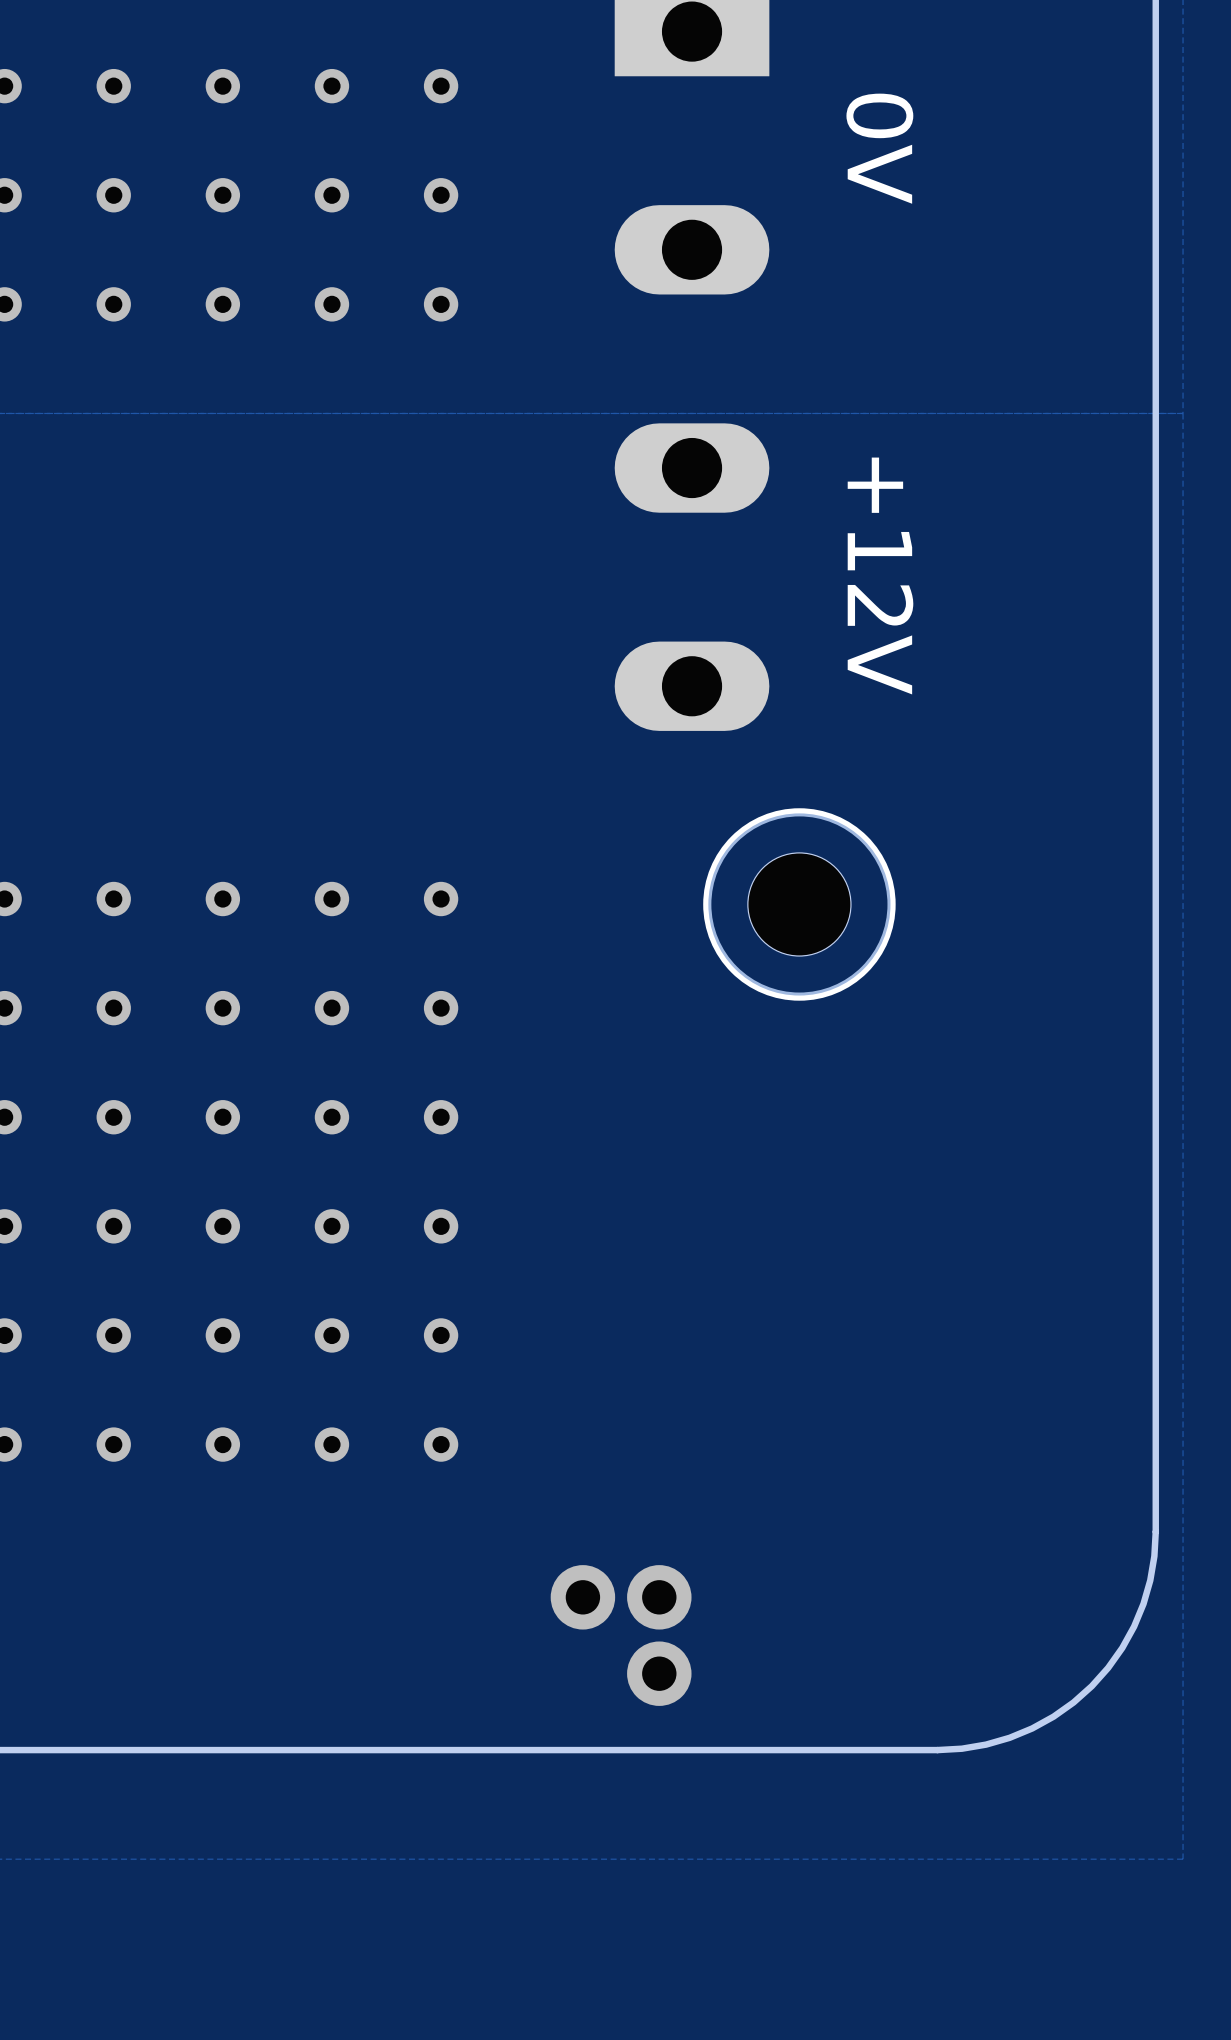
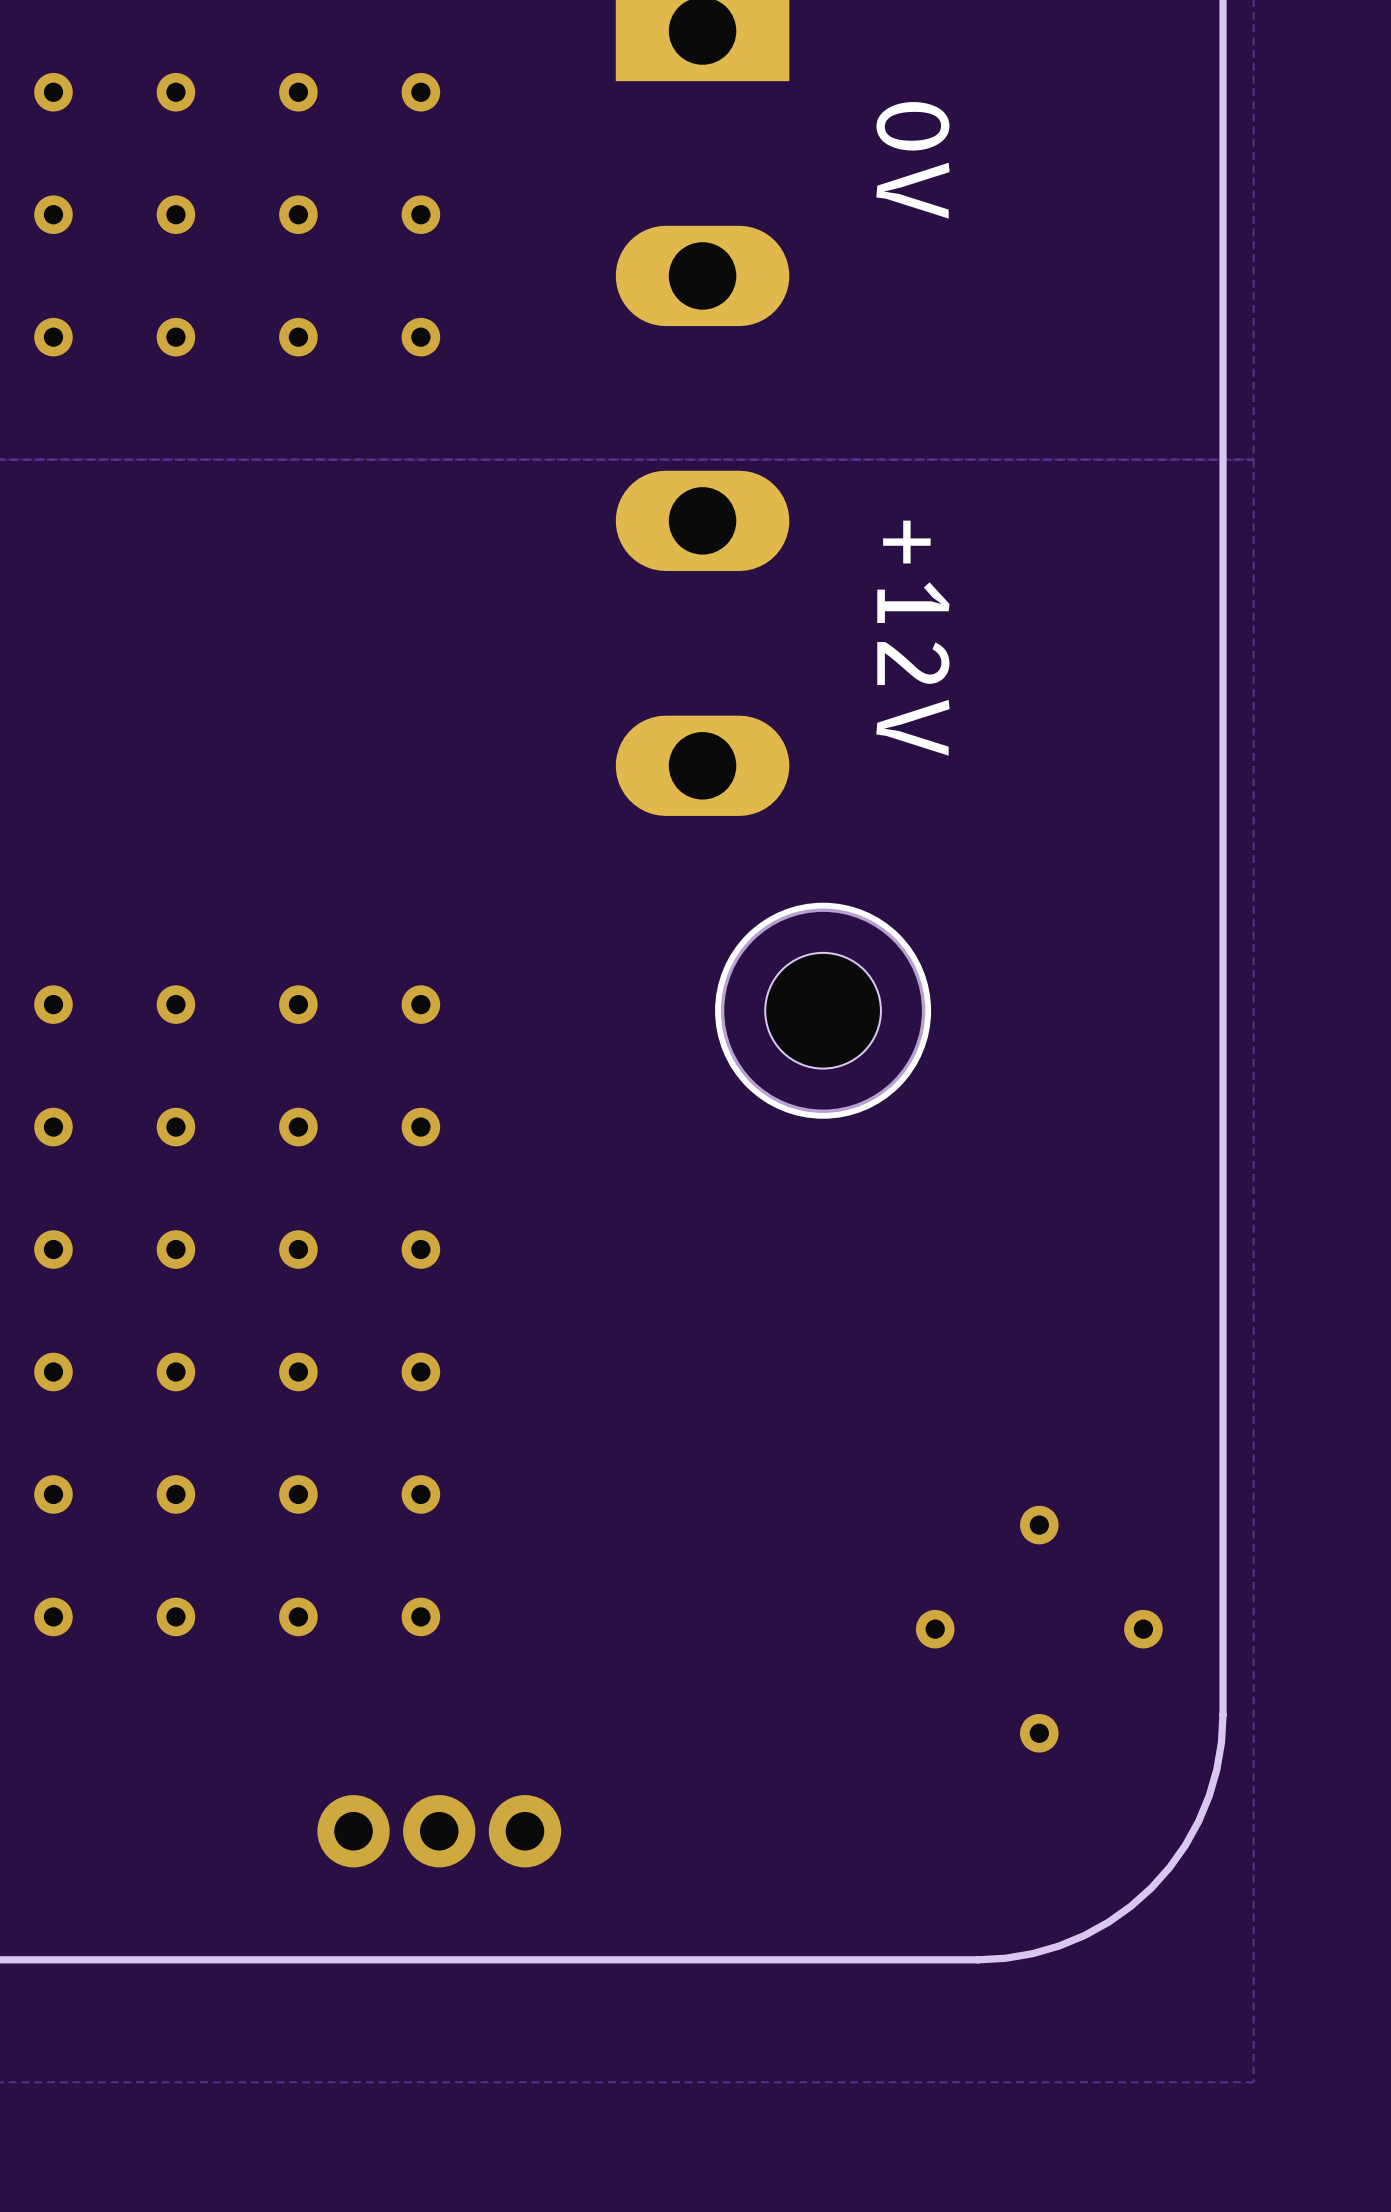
via: none -> (1039, 1525)
via: none -> (935, 1629)
via: none -> (1143, 1629)
via: none -> (1039, 1733)
via position: (582, 1597) -> (524, 1831)
via: (659, 1597) -> none
via: none -> (353, 1831)
via: none -> (439, 1831)
via: (659, 1673) -> none

